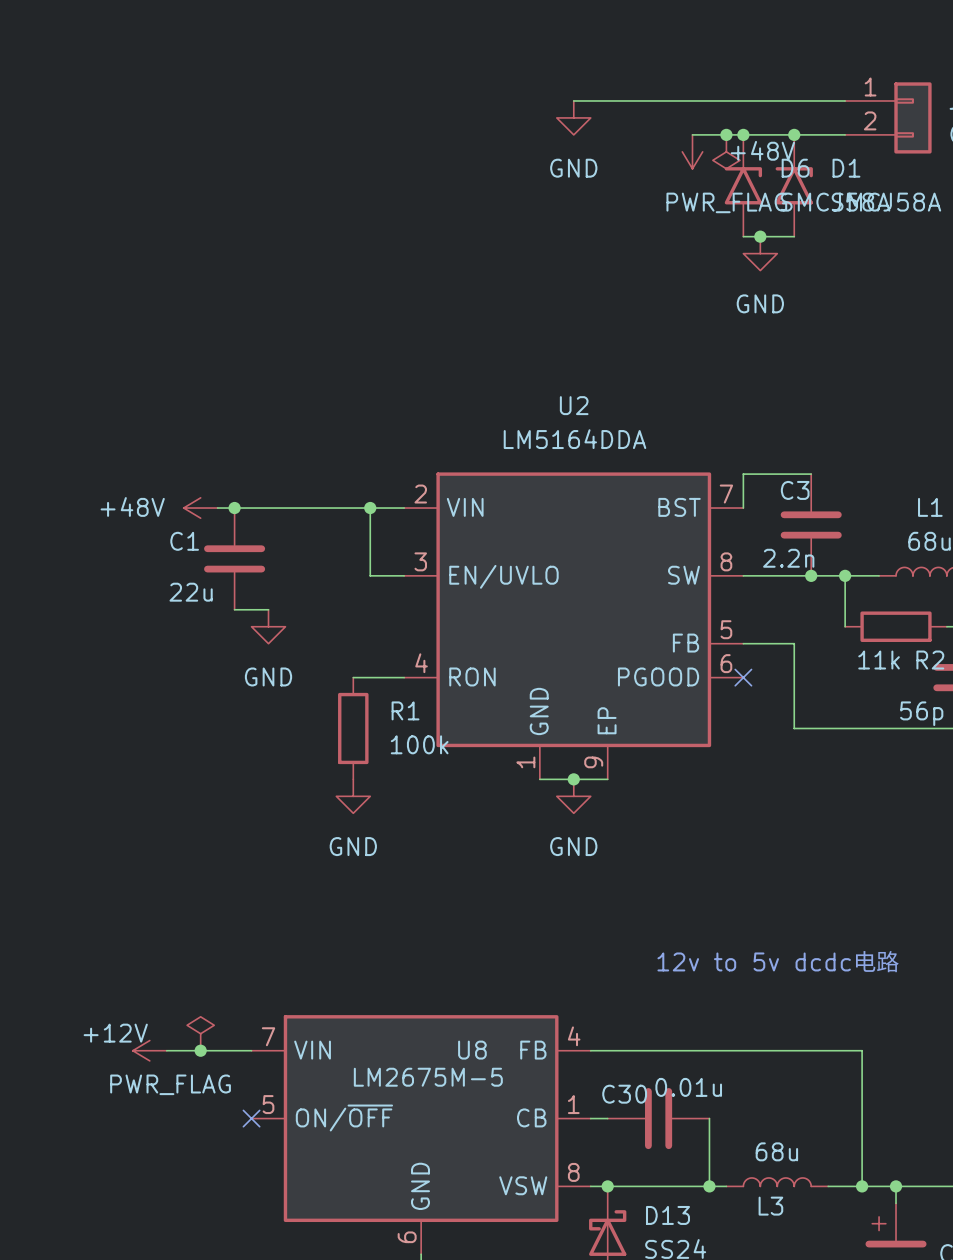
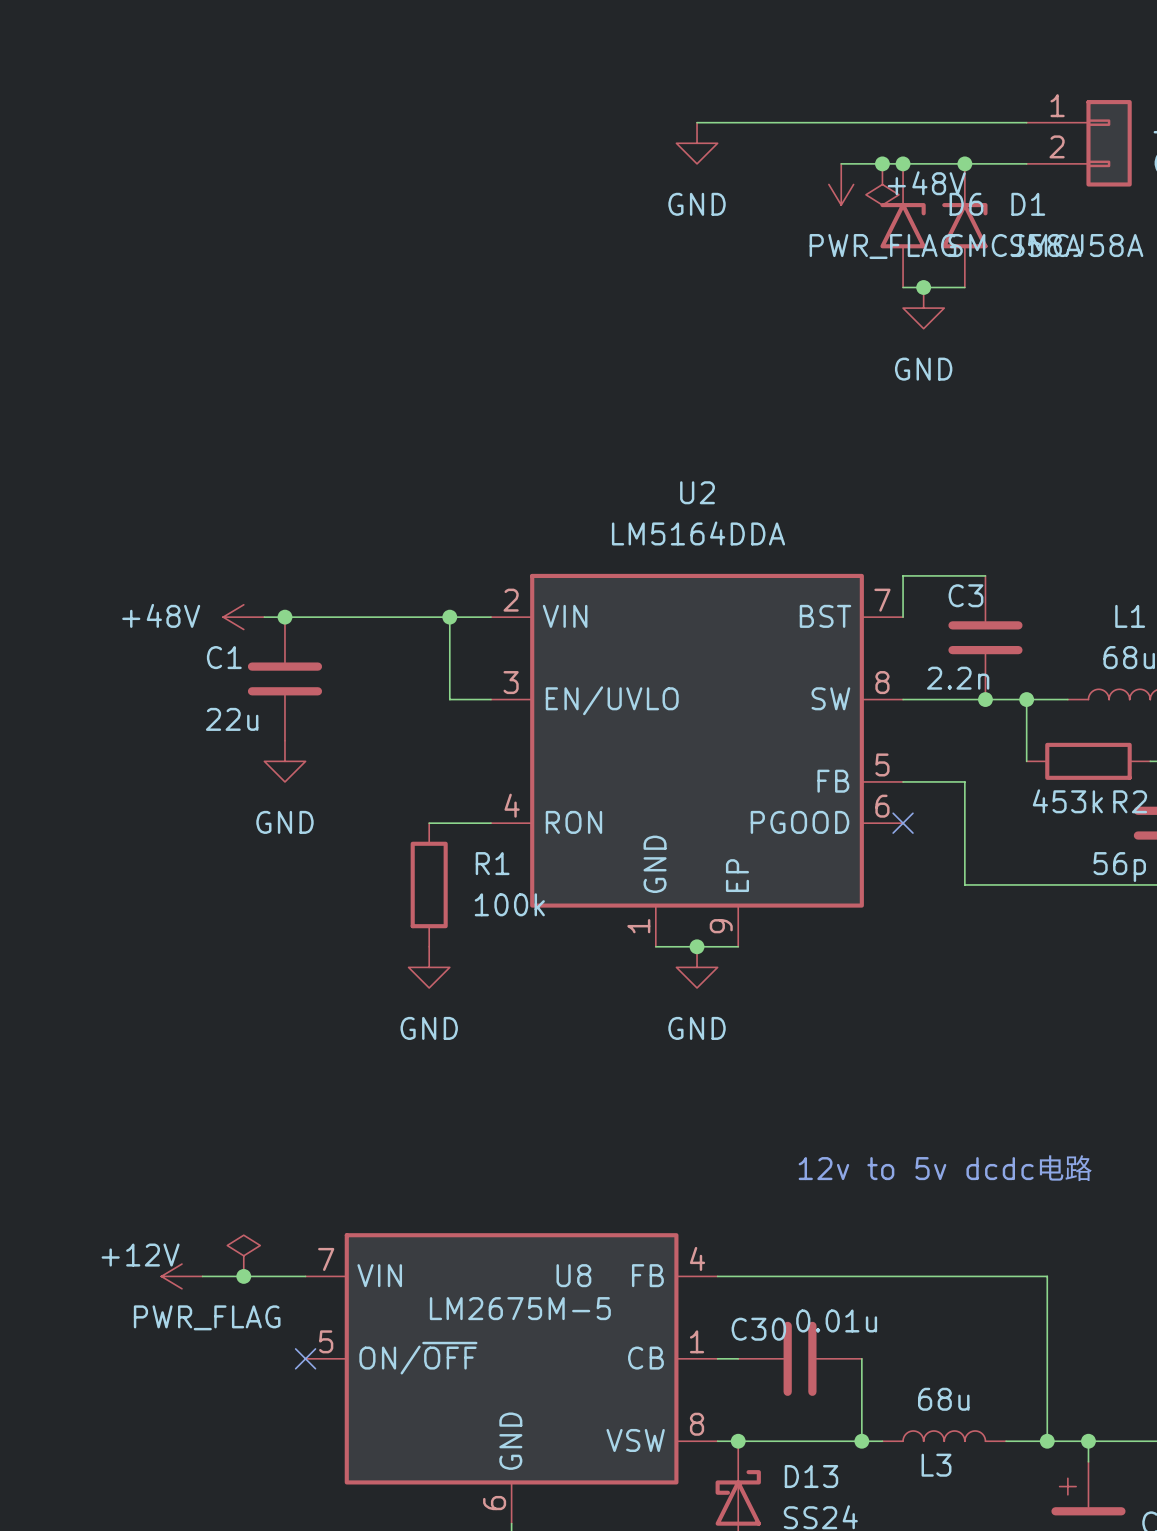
wire: (234, 609) (268, 609) -> none
power symbol position: GND (268, 626) -> GND (284, 761)
R2 value: 11k (879, 660) -> 453k (1067, 801)

